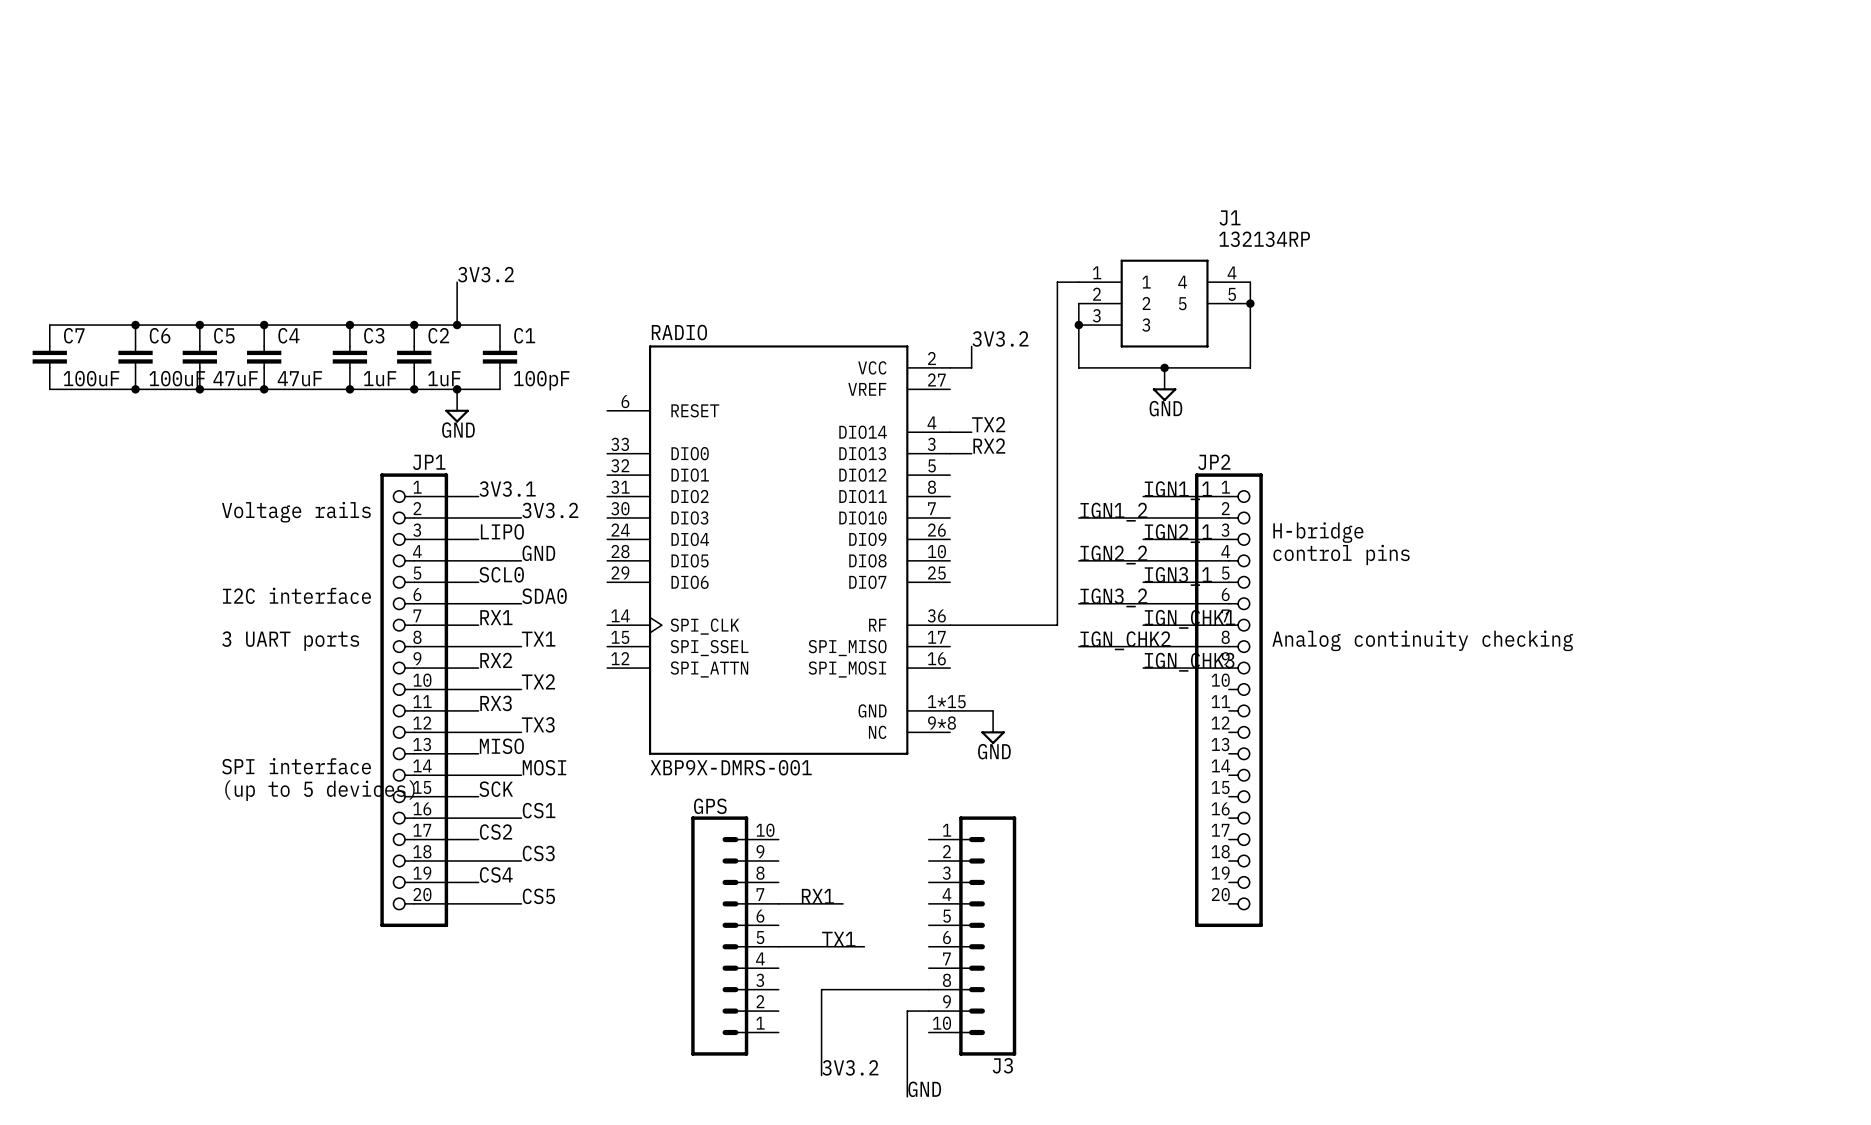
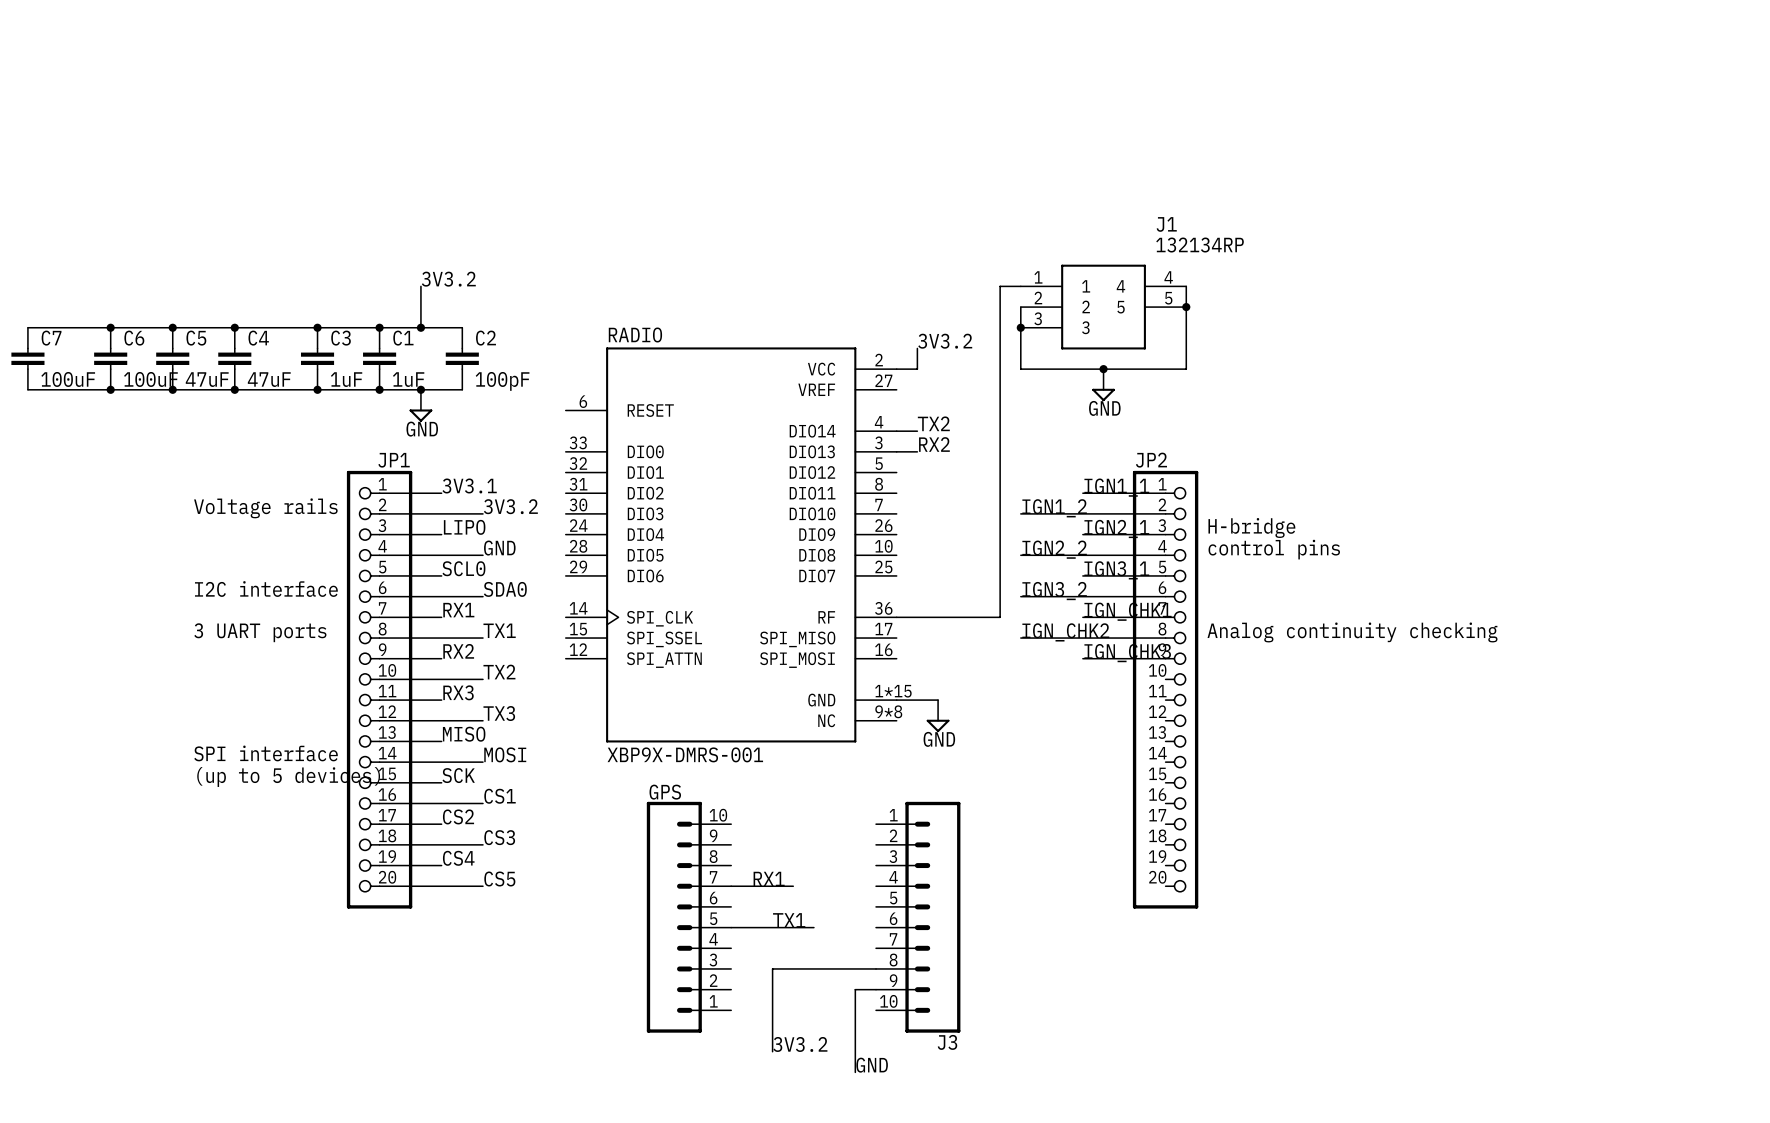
C2 name: C2 (438, 335) -> C1 (403, 338)
C1 name: C1 (524, 335) -> C2 (486, 338)

